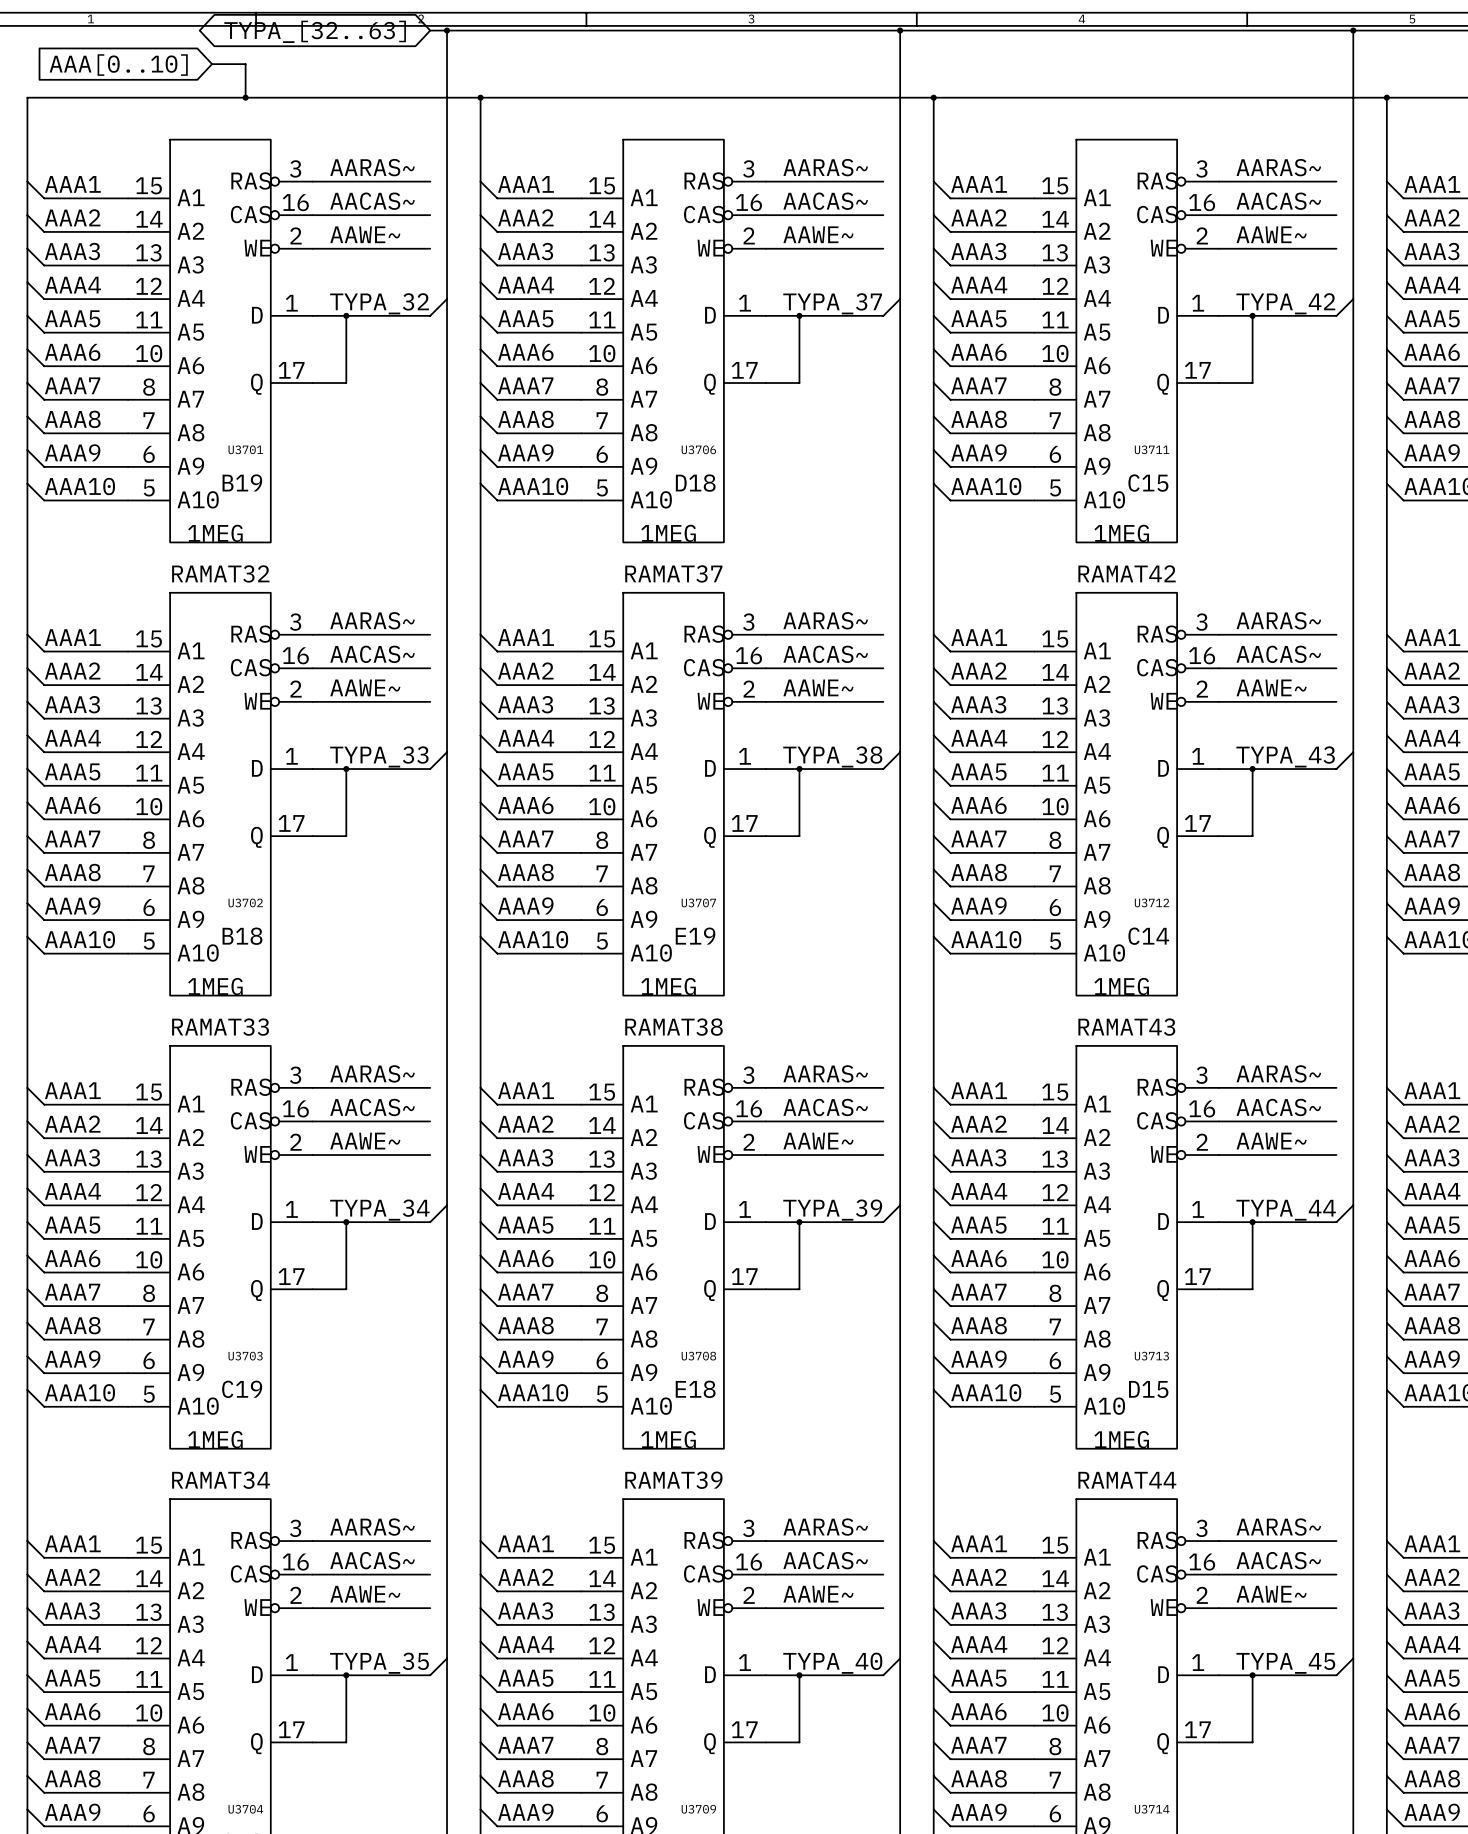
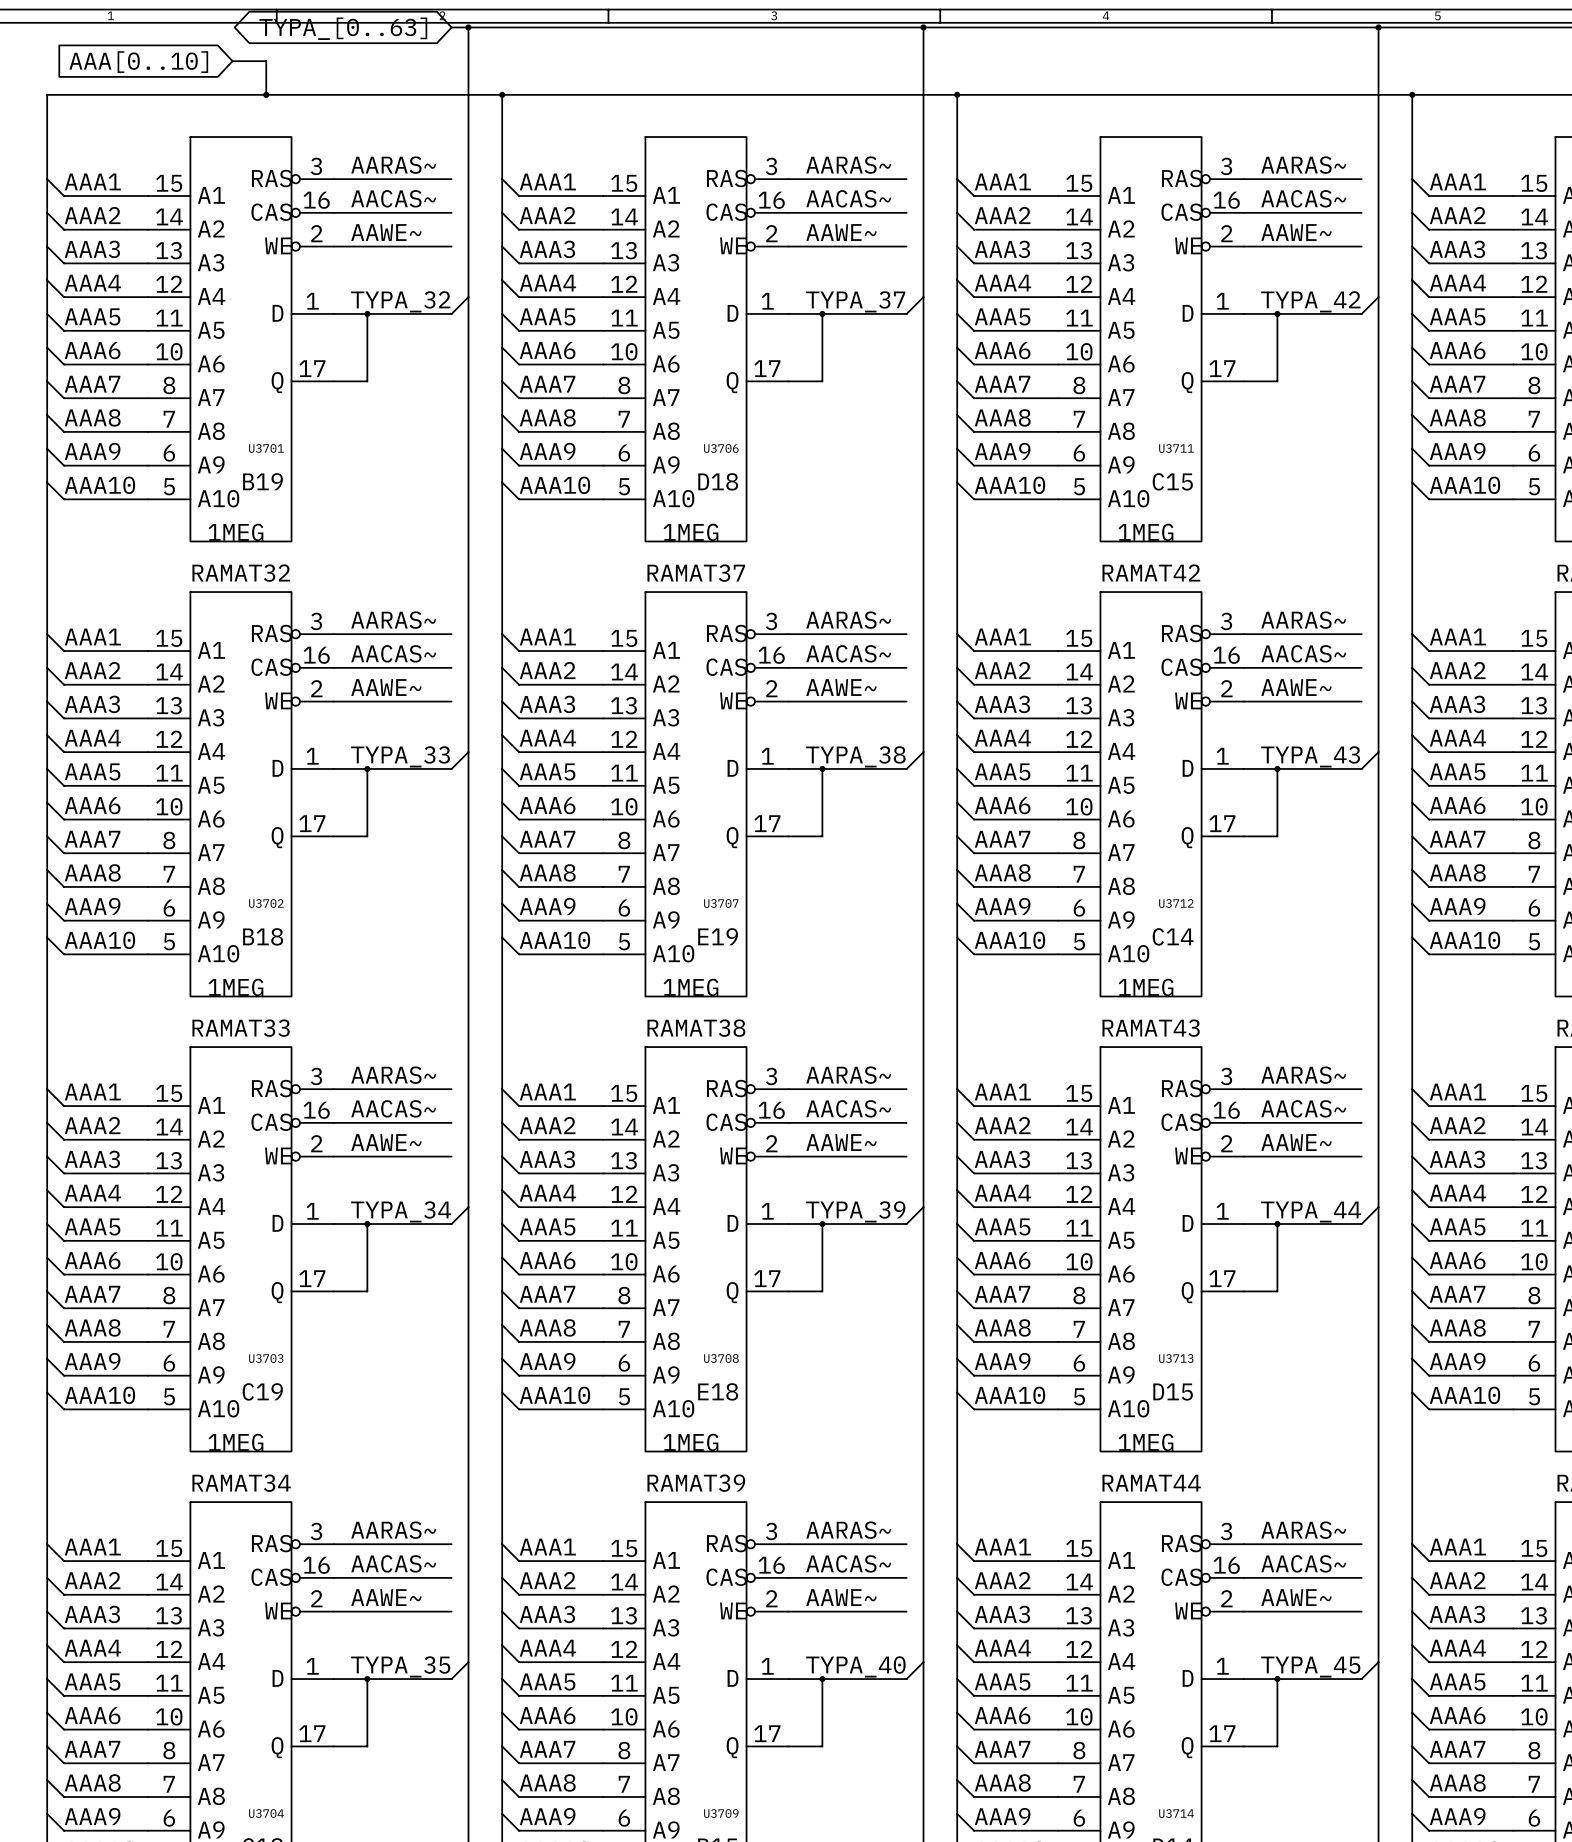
global label: TYPA_[32..63] (315, 31) -> TYPA_[0..63] (343, 28)

